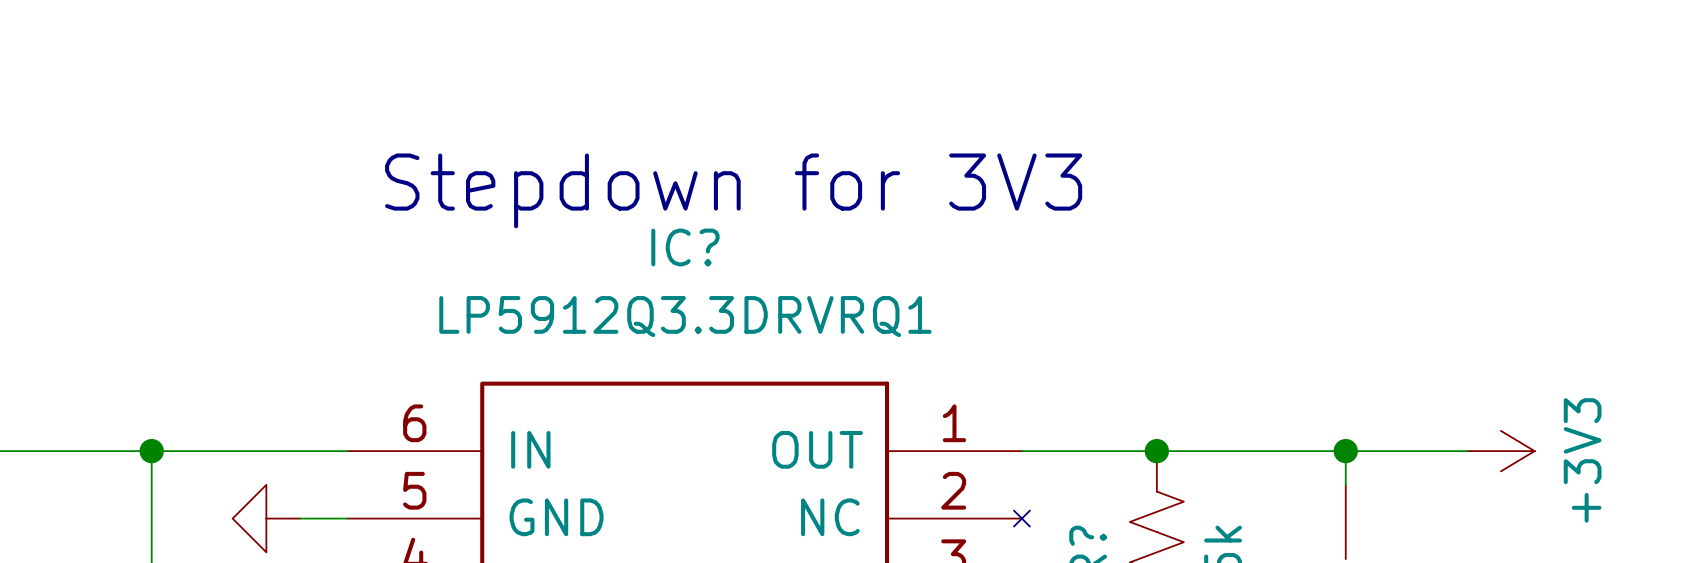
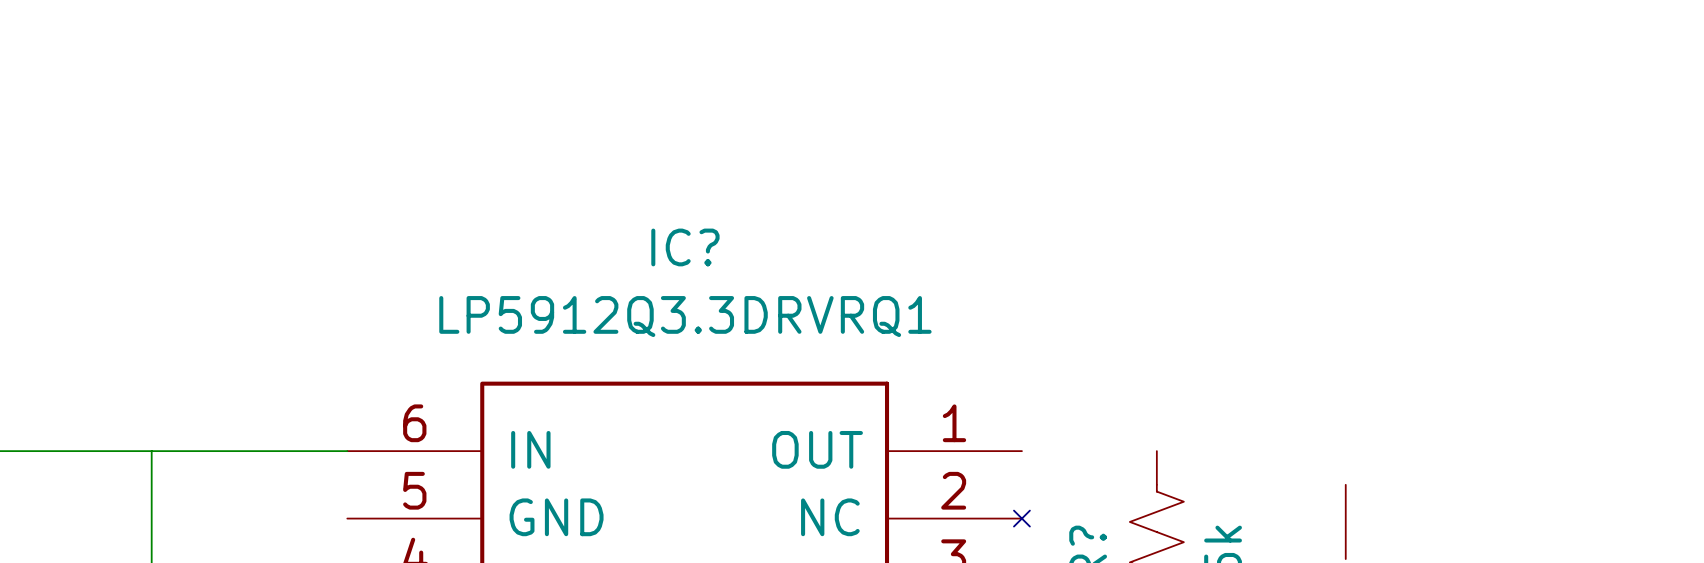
text: Stepdown for 3V3 (733, 190) -> none
junction: (151, 451) -> none
wire: (1021, 451) (1467, 451) -> none
junction: (1156, 451) -> none
wire: (1345, 451) (1345, 484) -> none
junction: (1345, 451) -> none
power symbol: +3V3 (1500, 451) -> none
power symbol: (266, 518) -> none
wire: (300, 518) (347, 518) -> none

